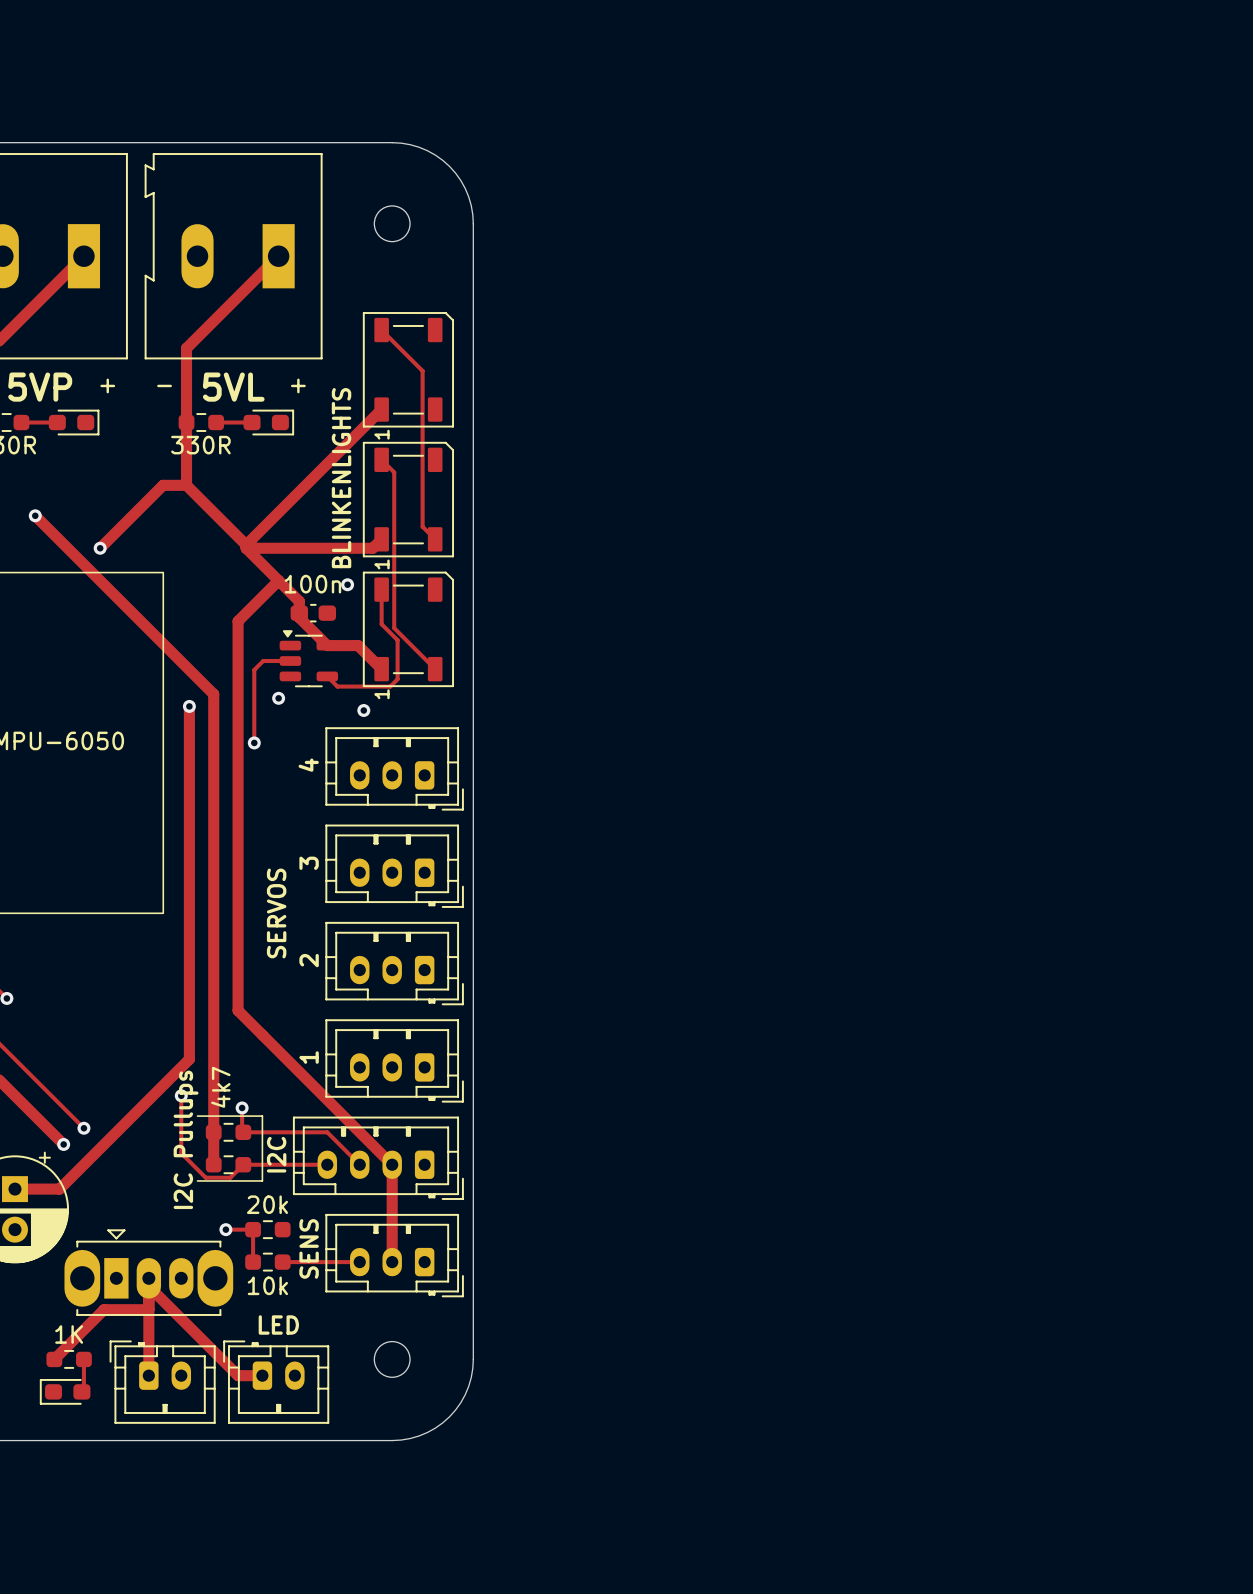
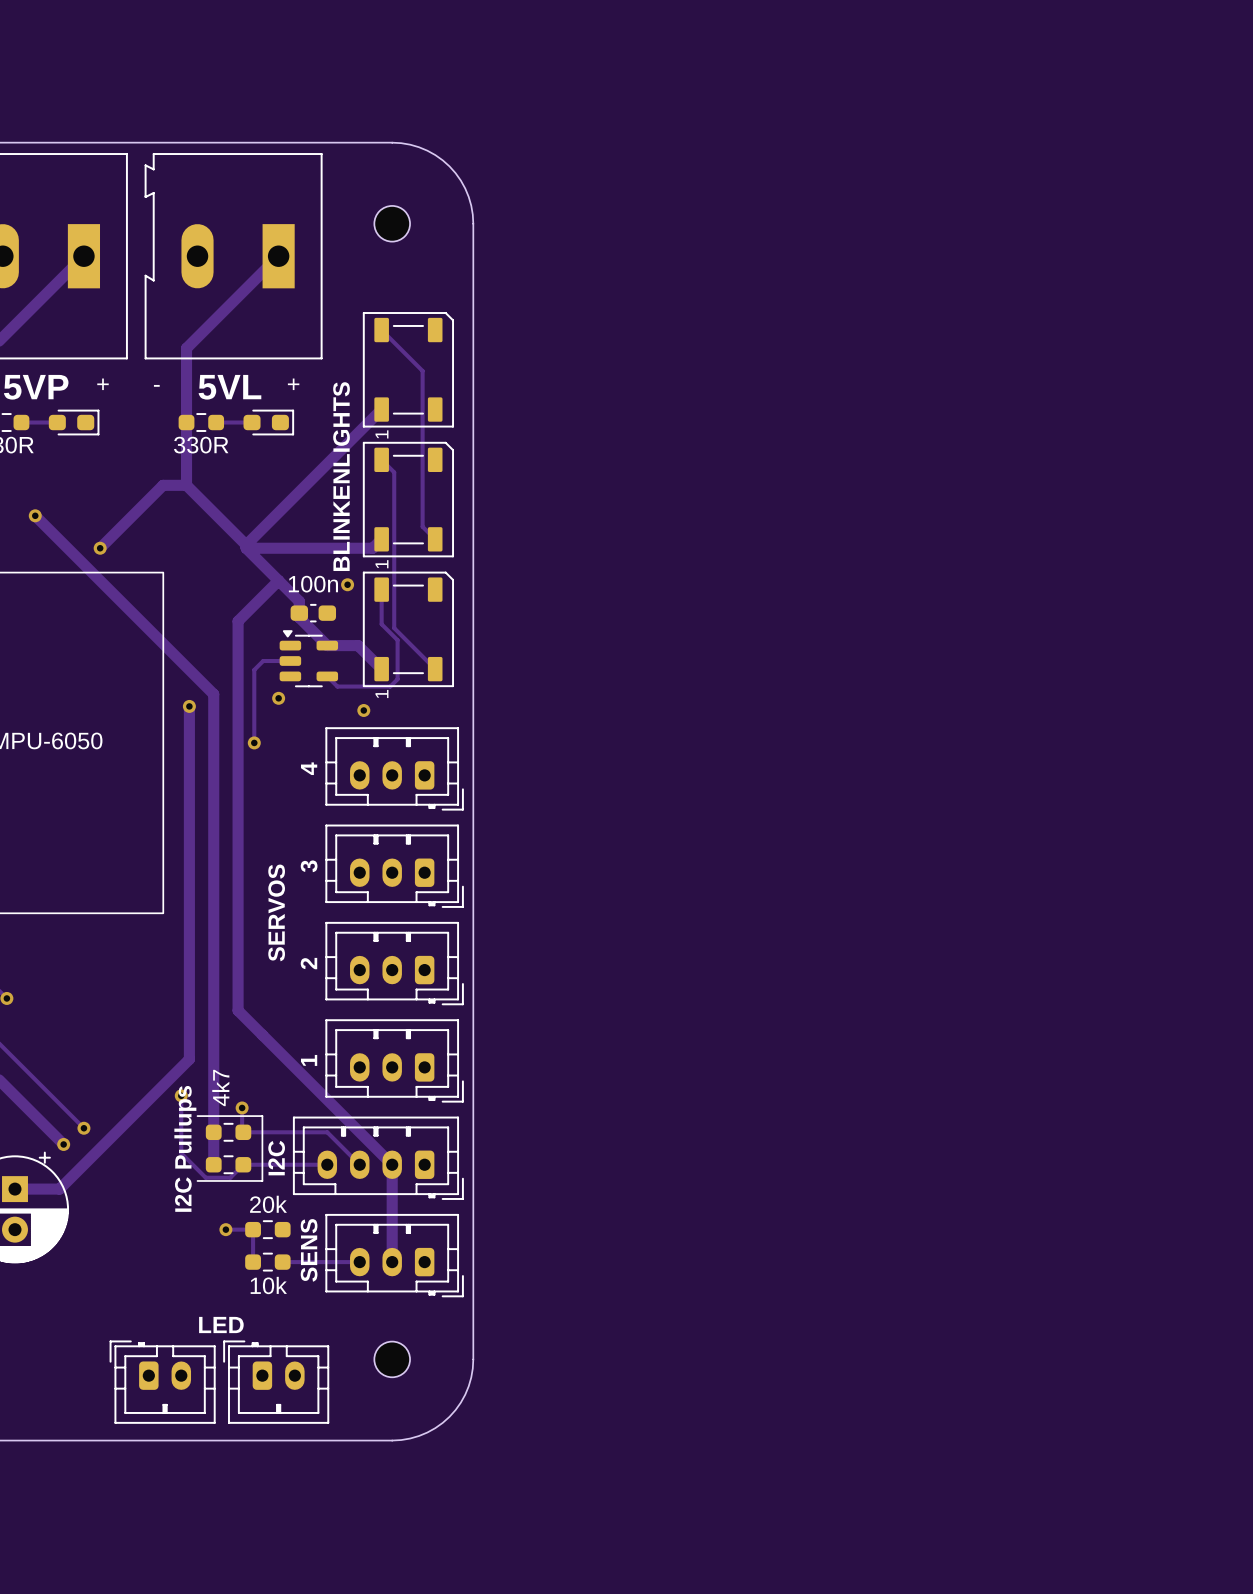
part: (148, 1272) -> none
track: (148, 1278) (148, 1375) -> none
track: (148, 1286) (238, 1375) (262, 1375) -> none
track: (148, 1309) (104, 1309) (54, 1359) -> none
text position: LED (278, 1325) -> LED (221, 1325)
part: 1K (69, 1359) -> none
track: (83, 1359) (83, 1389) (81, 1391) -> none
part: (65, 1391) -> none

